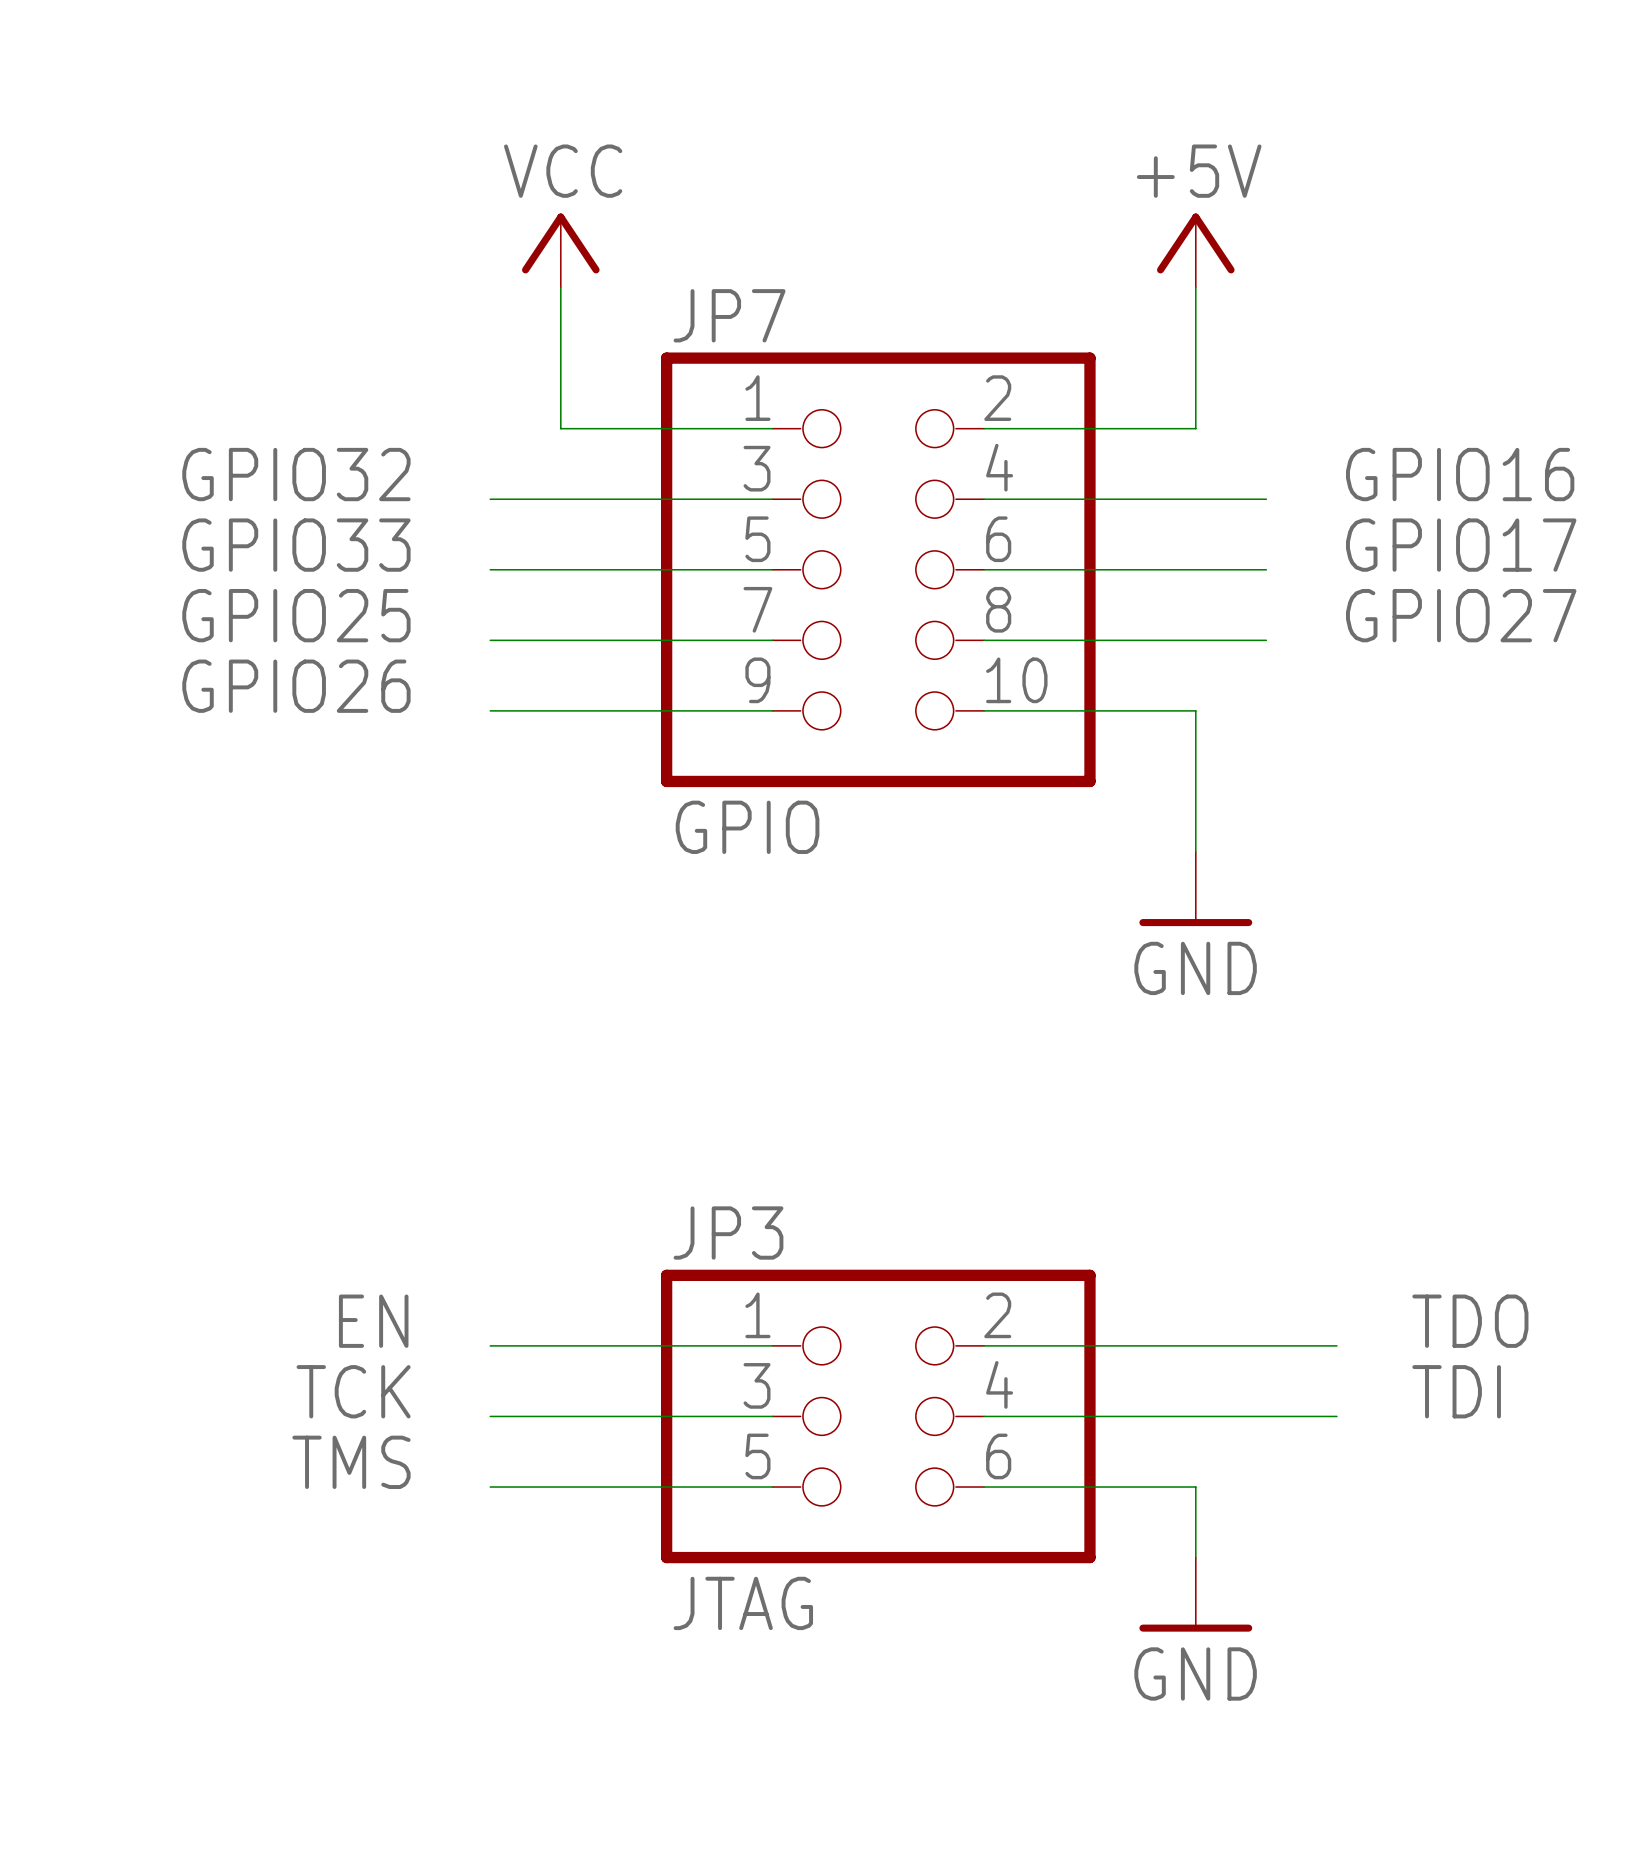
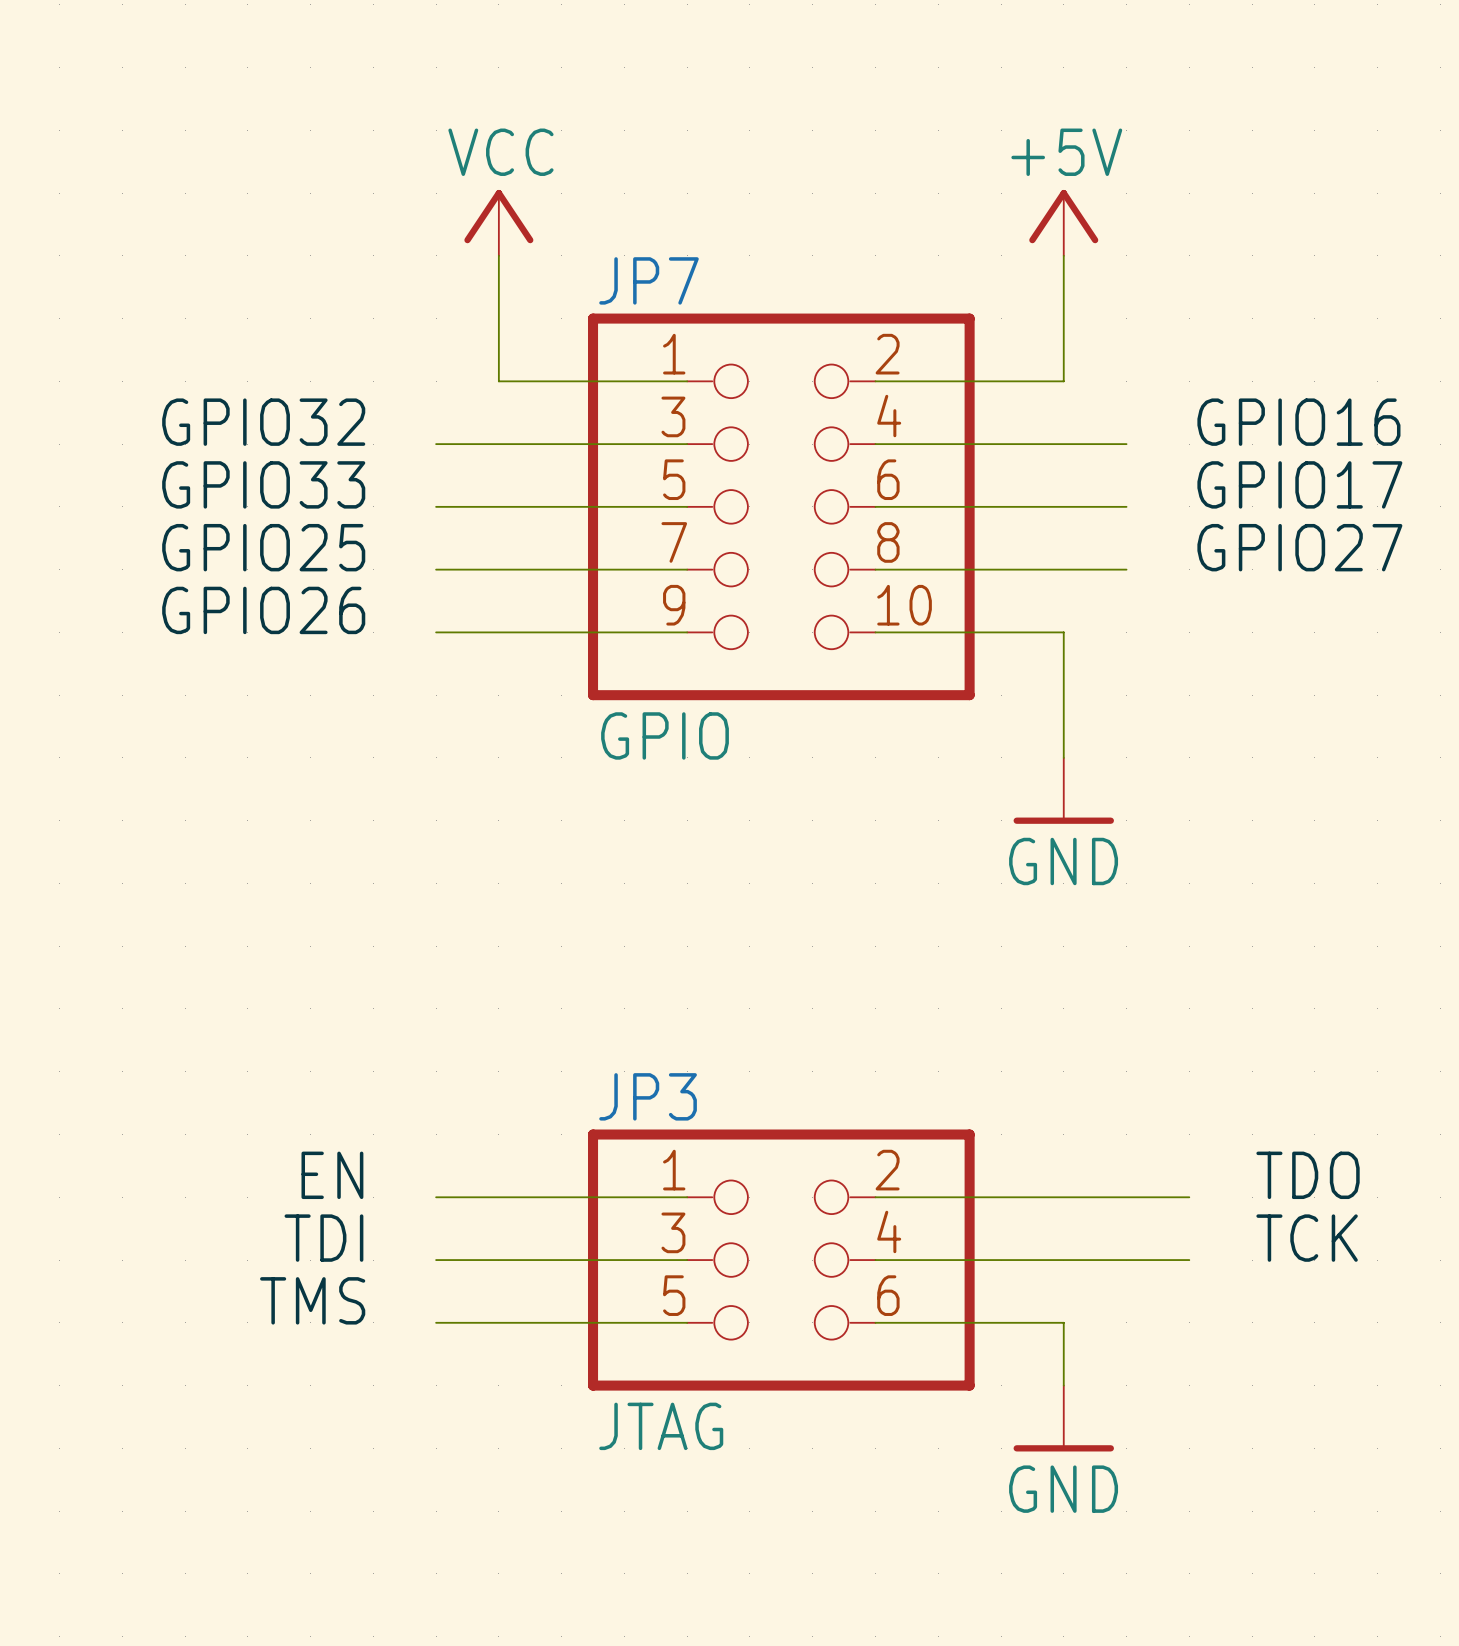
label: TCK (353, 1391) -> TDI (323, 1238)
label: TDI (1456, 1391) -> TCK (1307, 1238)

